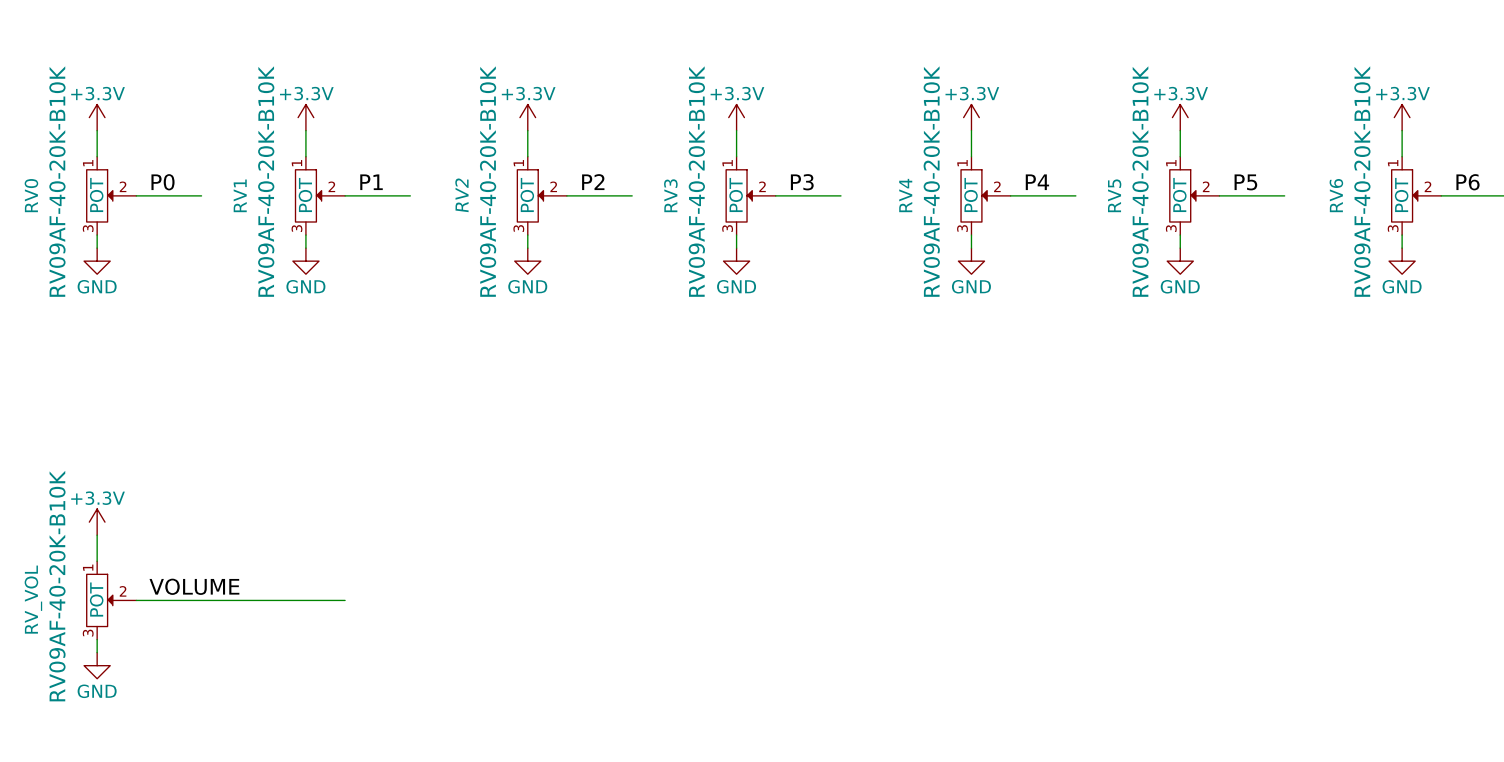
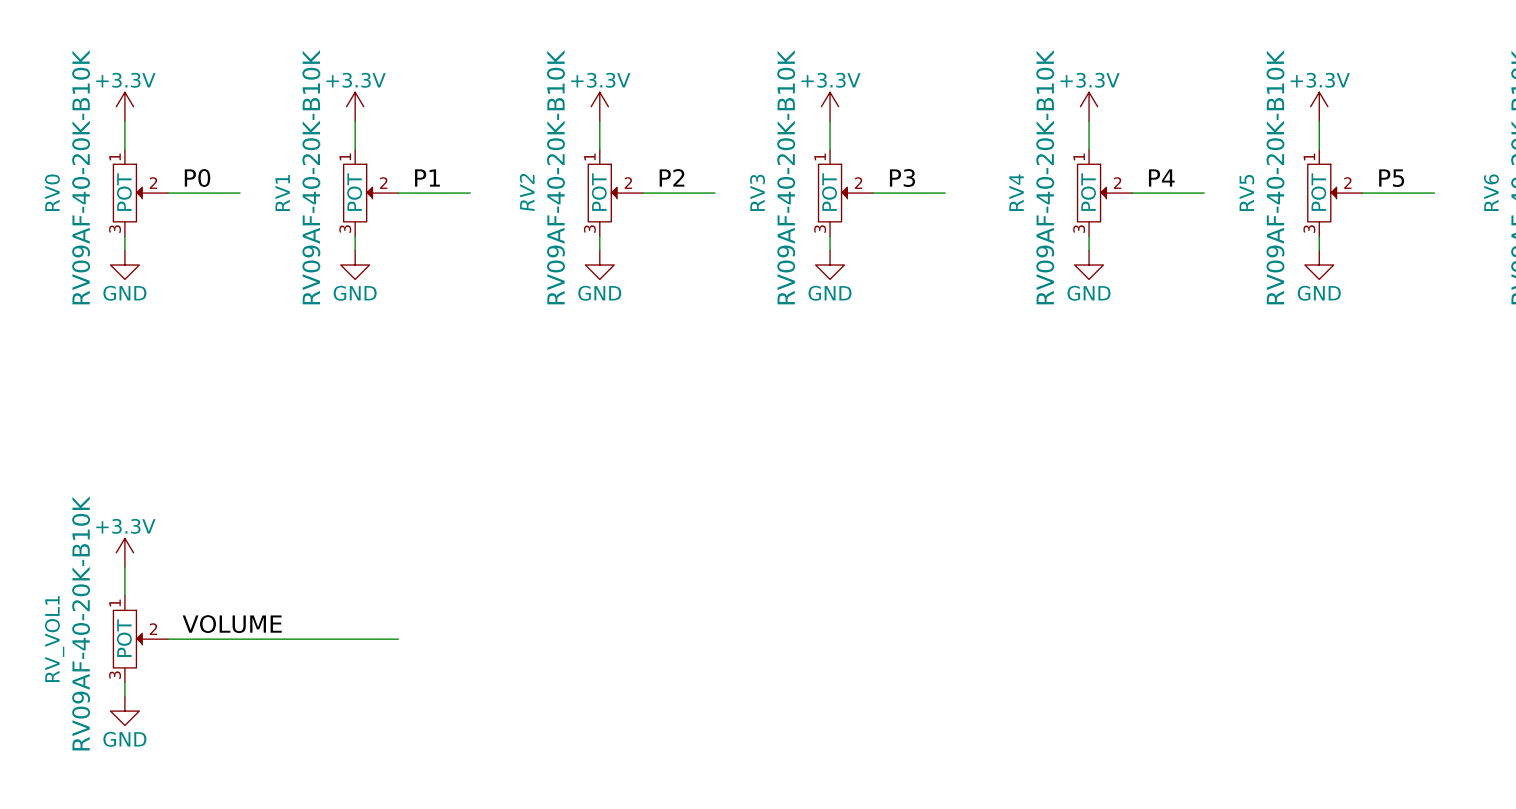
RV_VOL name: RV_VOL (33, 599) -> RV_VOL1 (54, 639)

